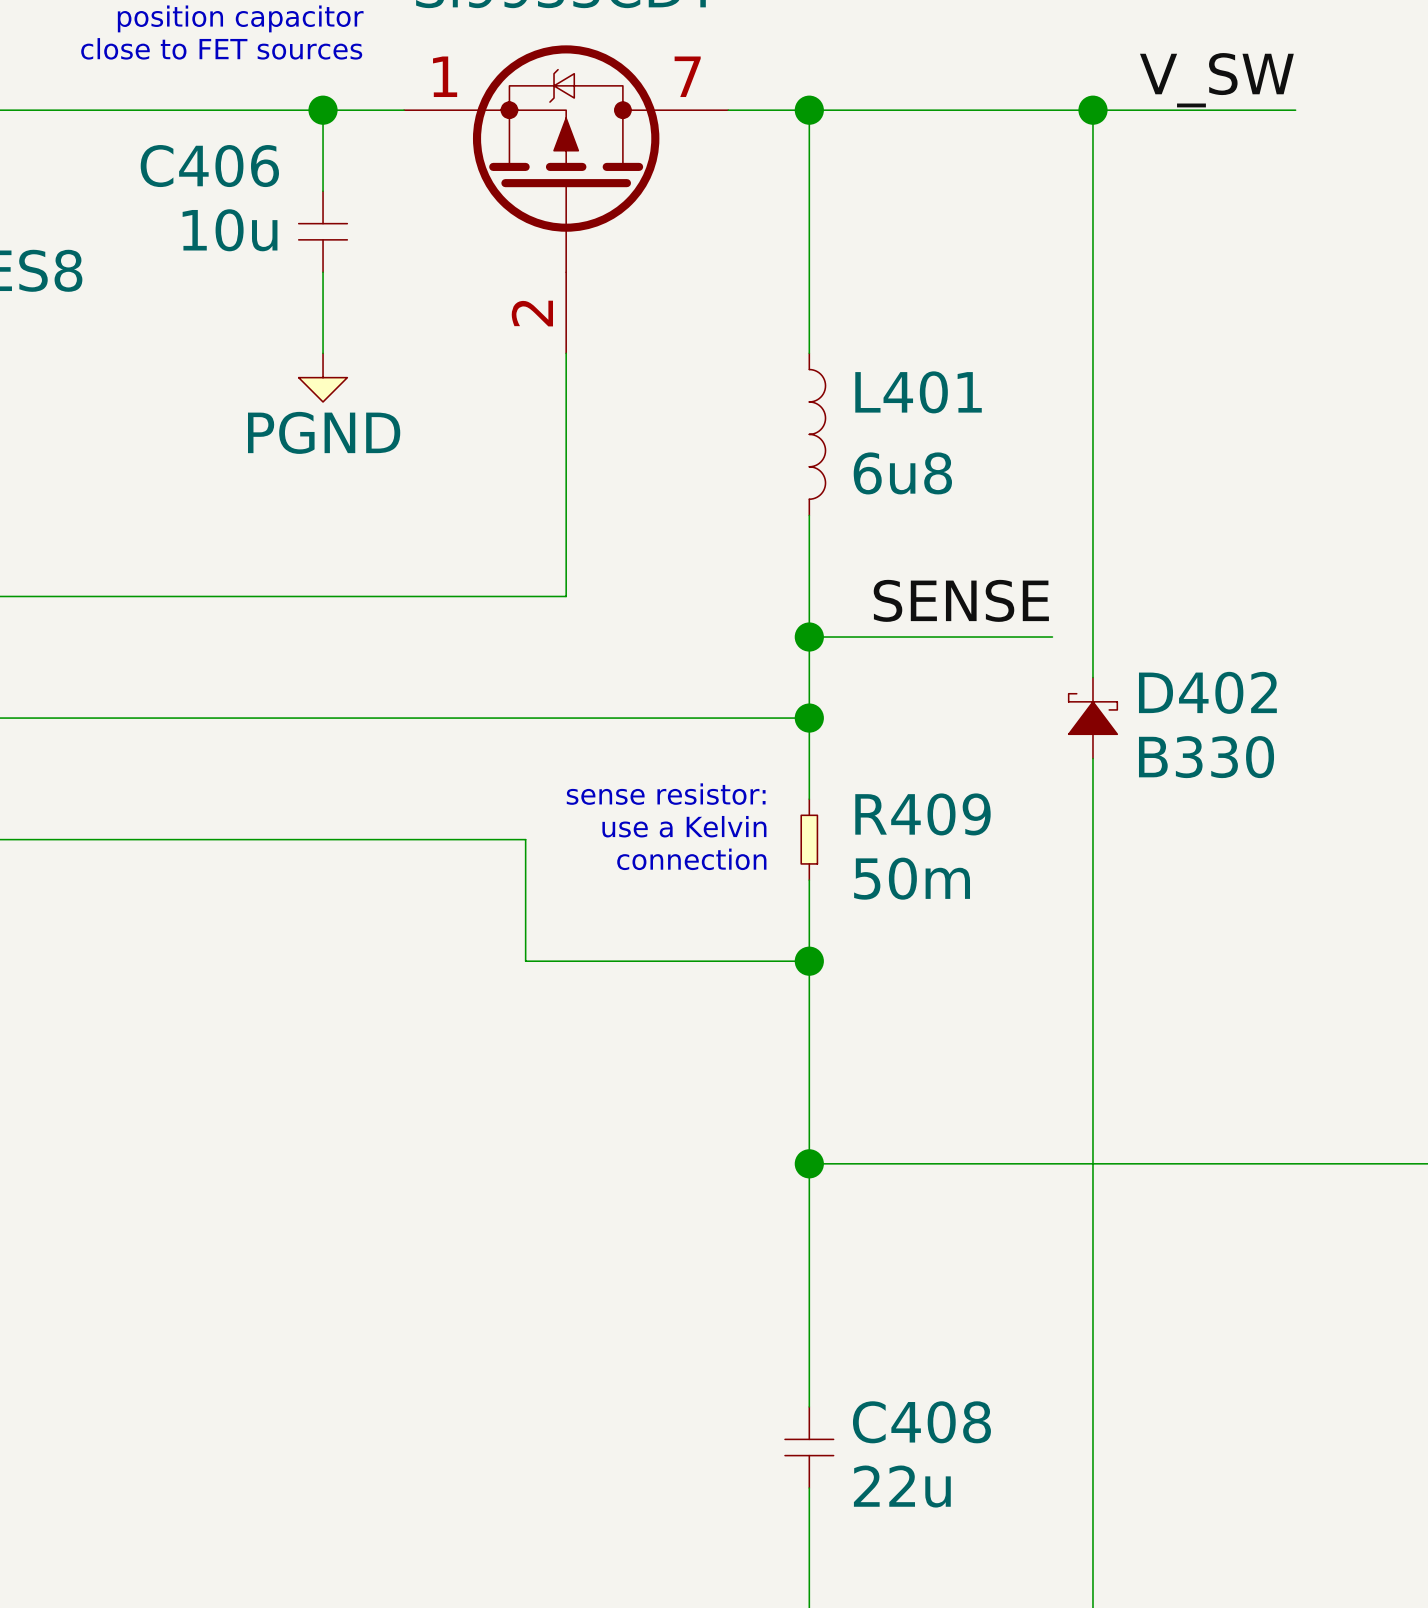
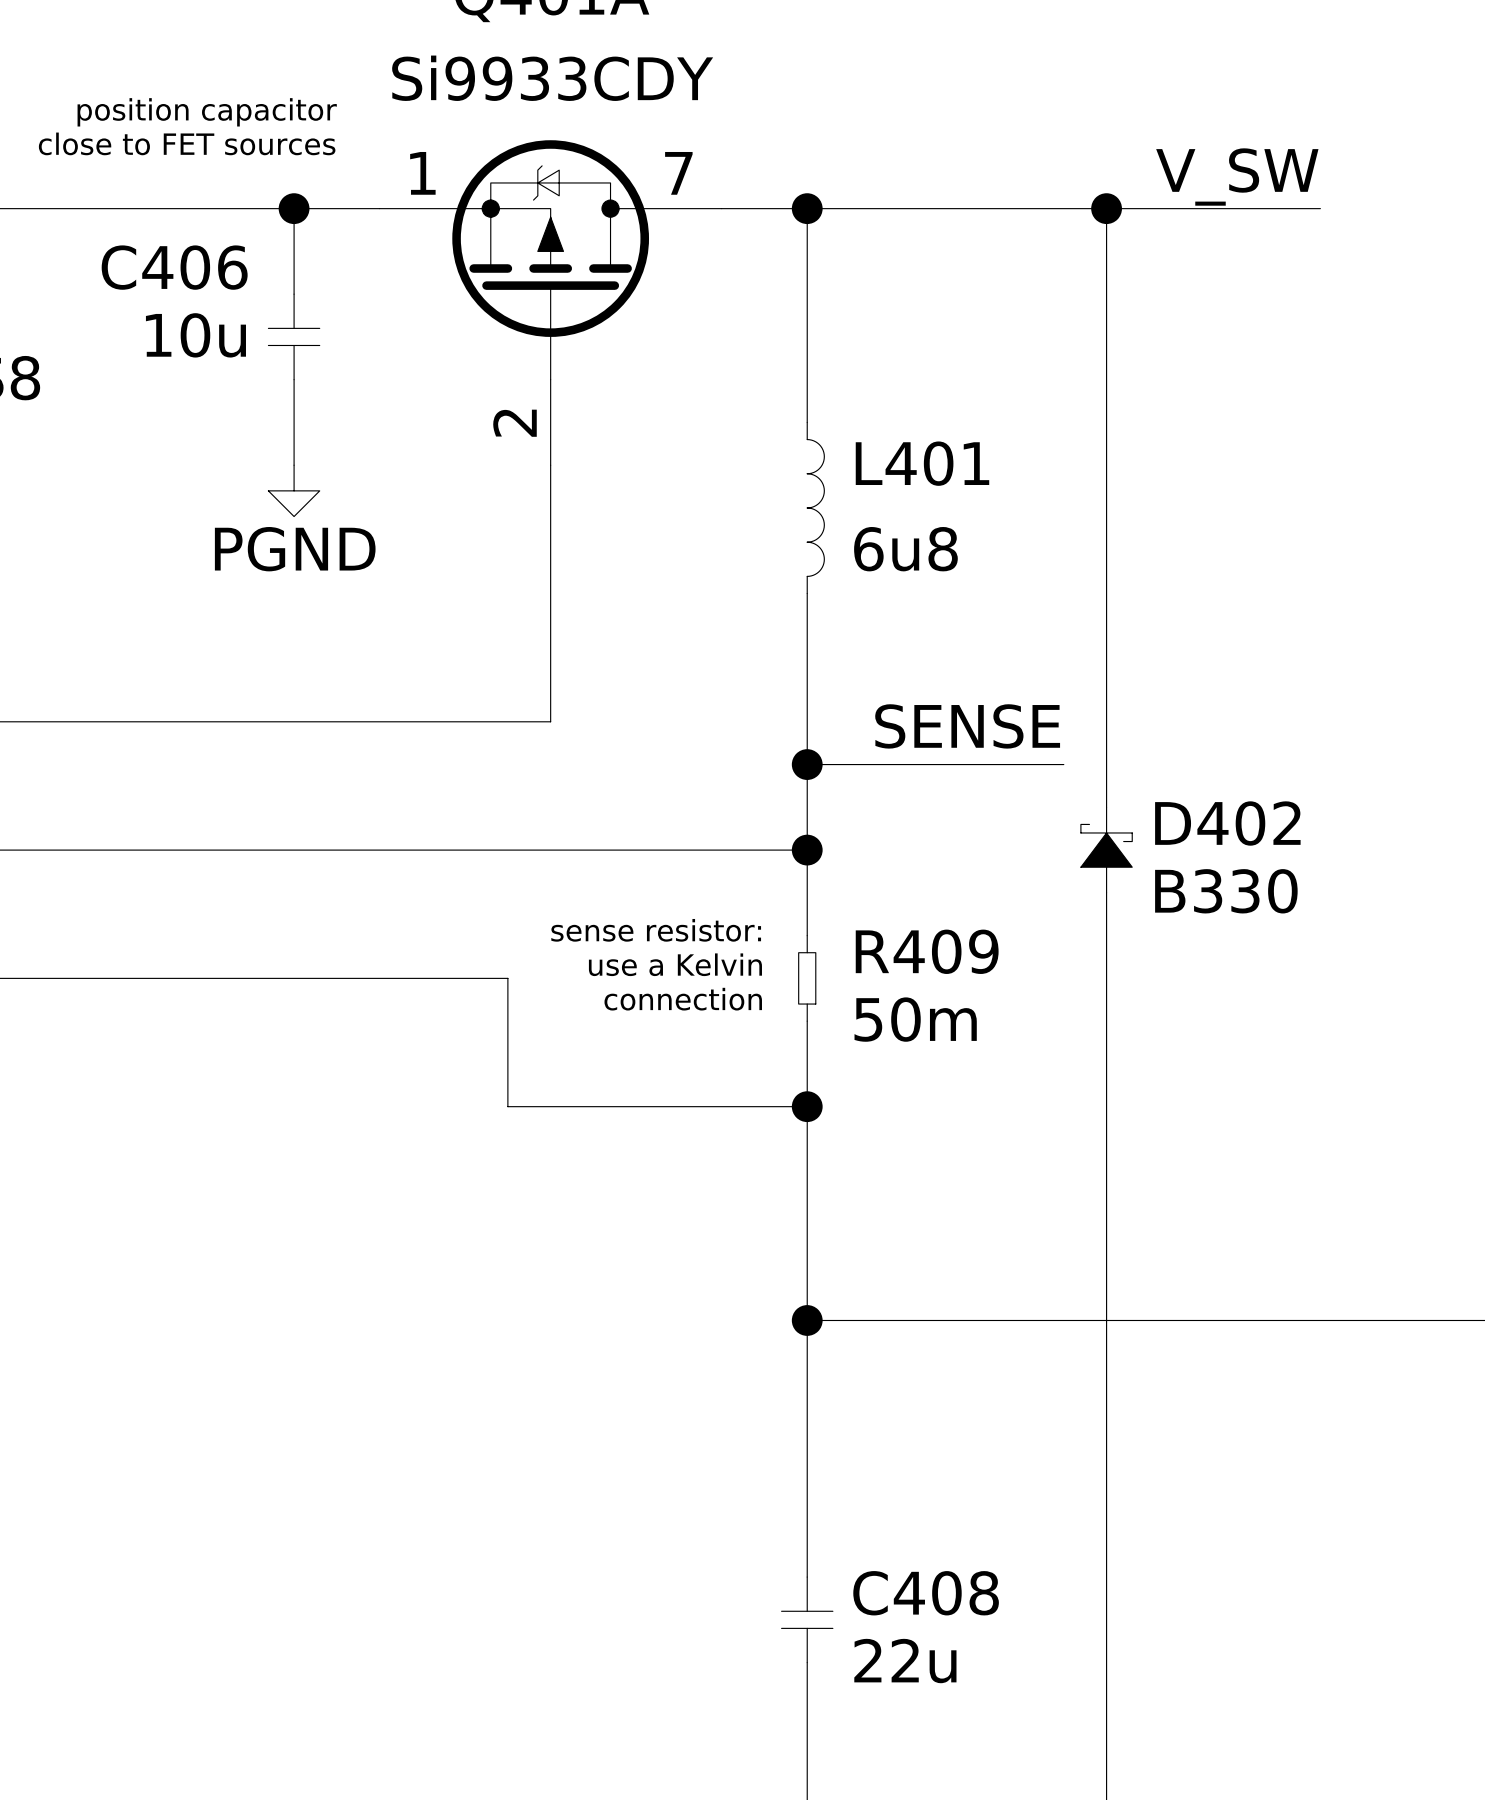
wire: (809, 312) (809, 353) -> (807, 593) (807, 636)
L401 position: (817, 434) -> (815, 507)

